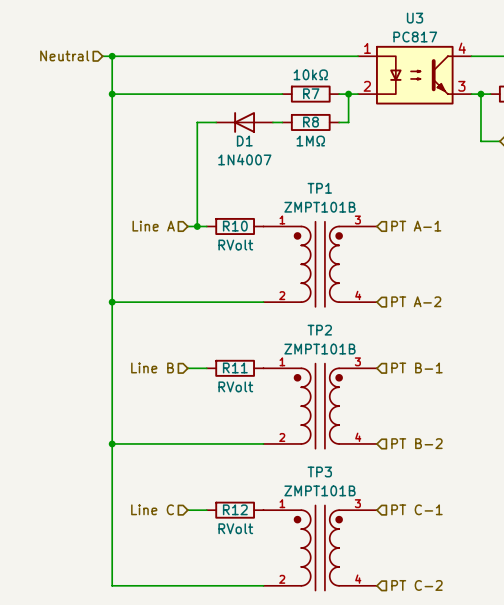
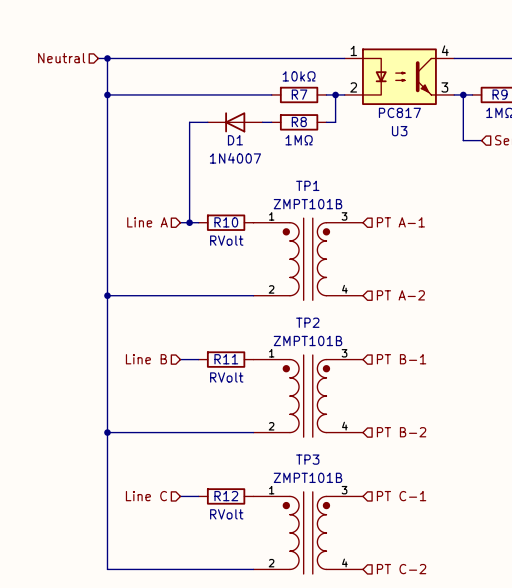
U3 name position: U3 (415, 18) -> U3 (399, 131)
U3 value position: PC817 (415, 37) -> PC817 (399, 112)

